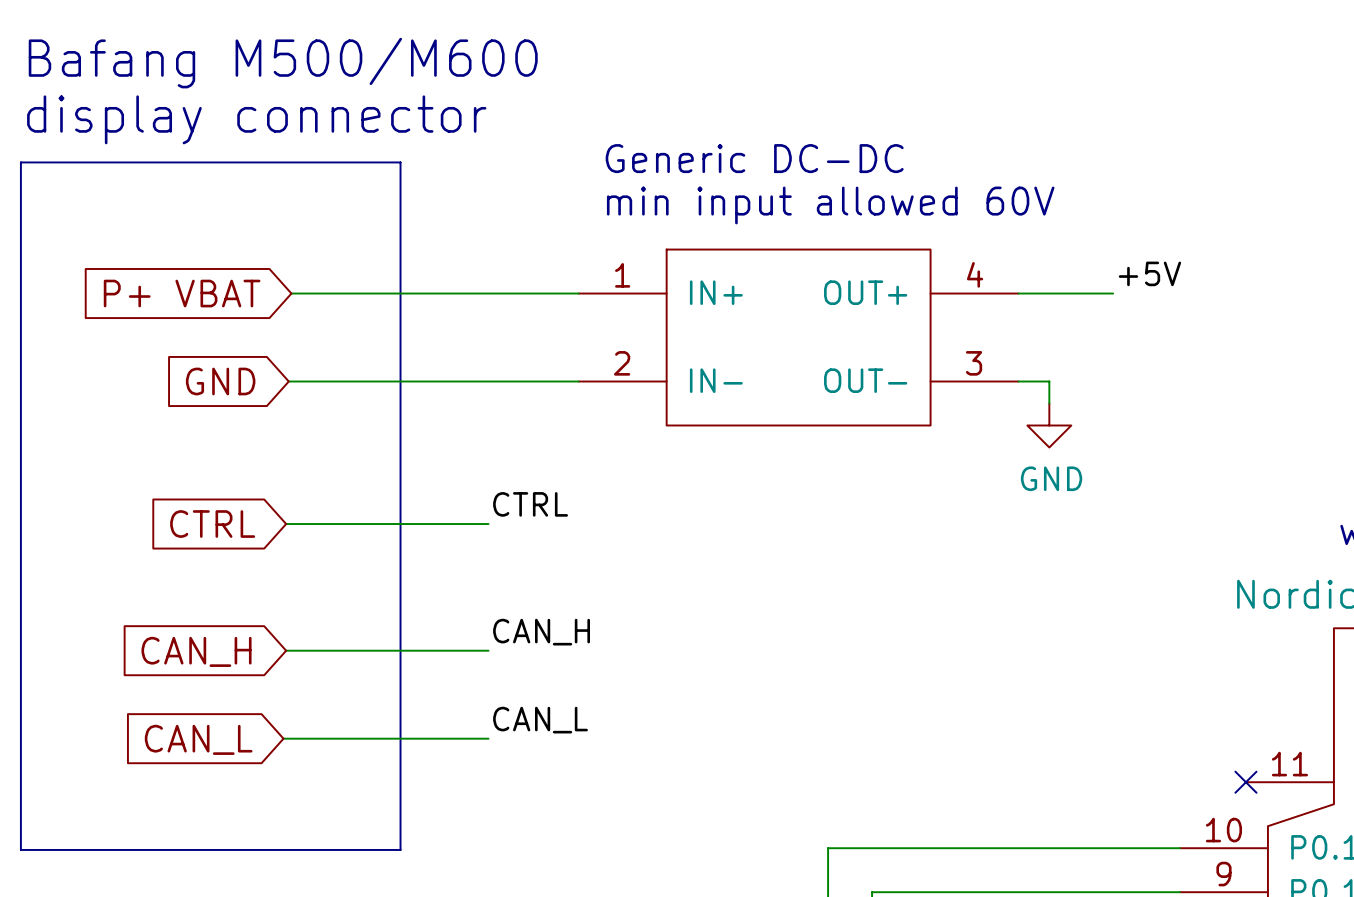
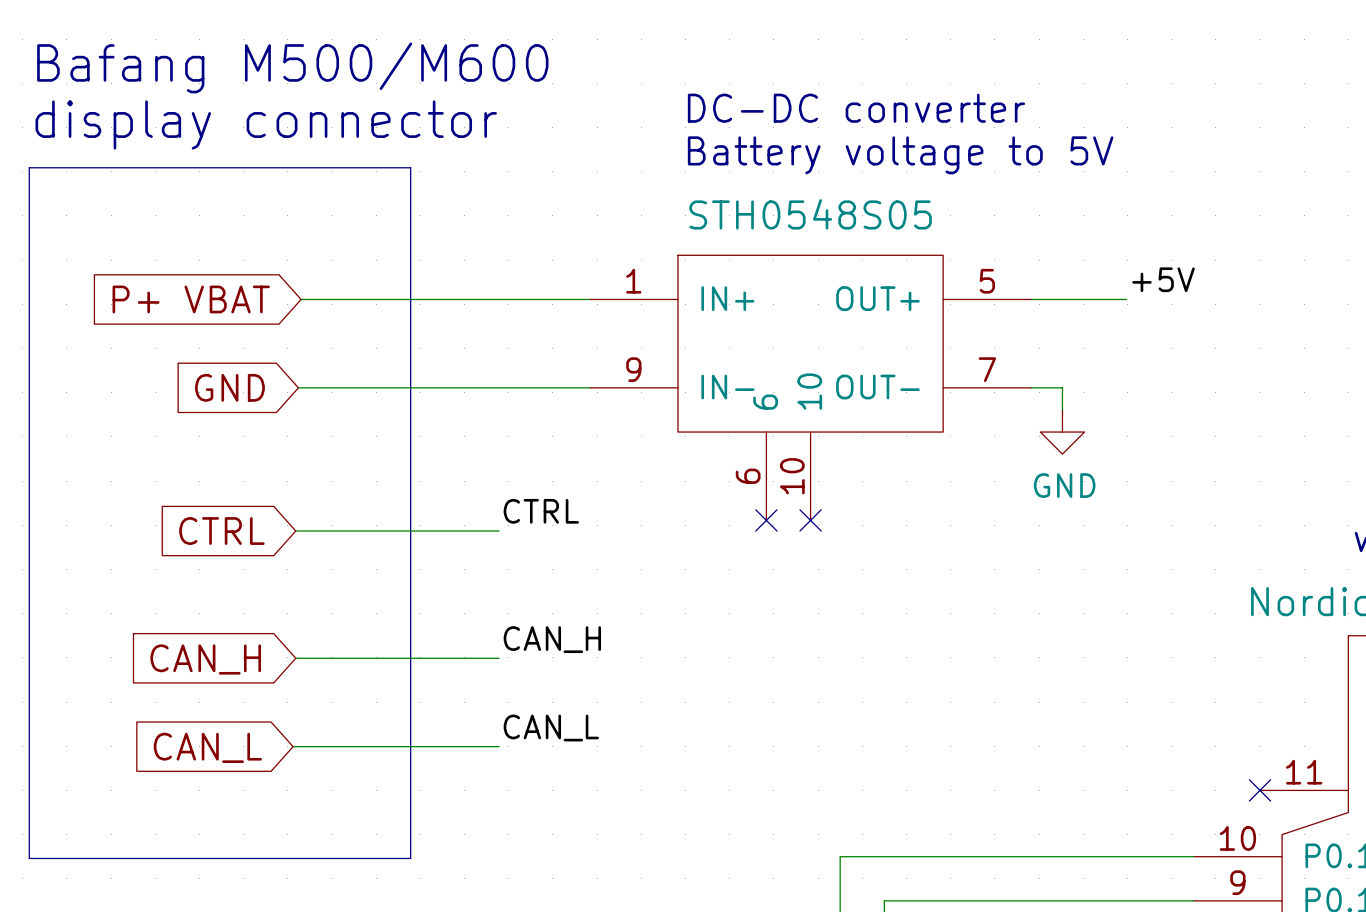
text: none -> DC-DC converter (856, 108)
text: none -> Battery voltage to 5V (900, 155)
text: Generic DC-DC (754, 158) -> none
text: min input allowed 60V (830, 205) -> none
part: (798, 337) -> none
part: none -> STH0548S05 (810, 387)
no-connect mark: none -> (766, 520)
no-connect mark: none -> (810, 520)

